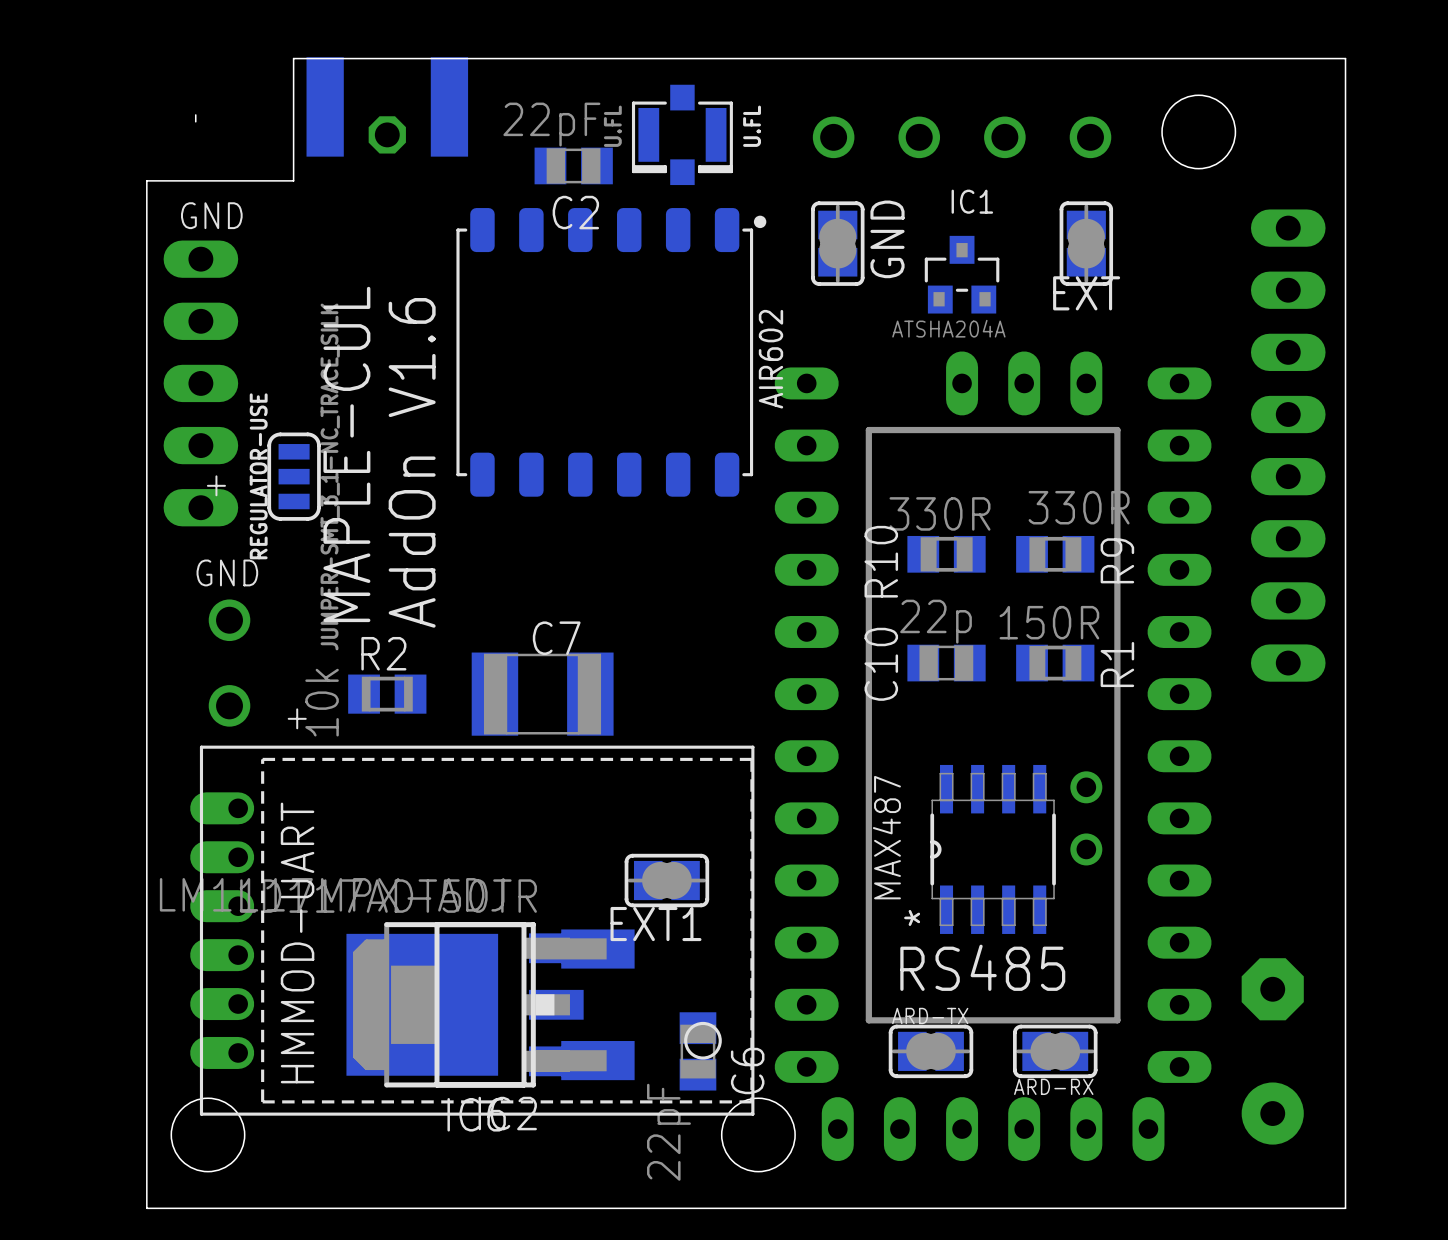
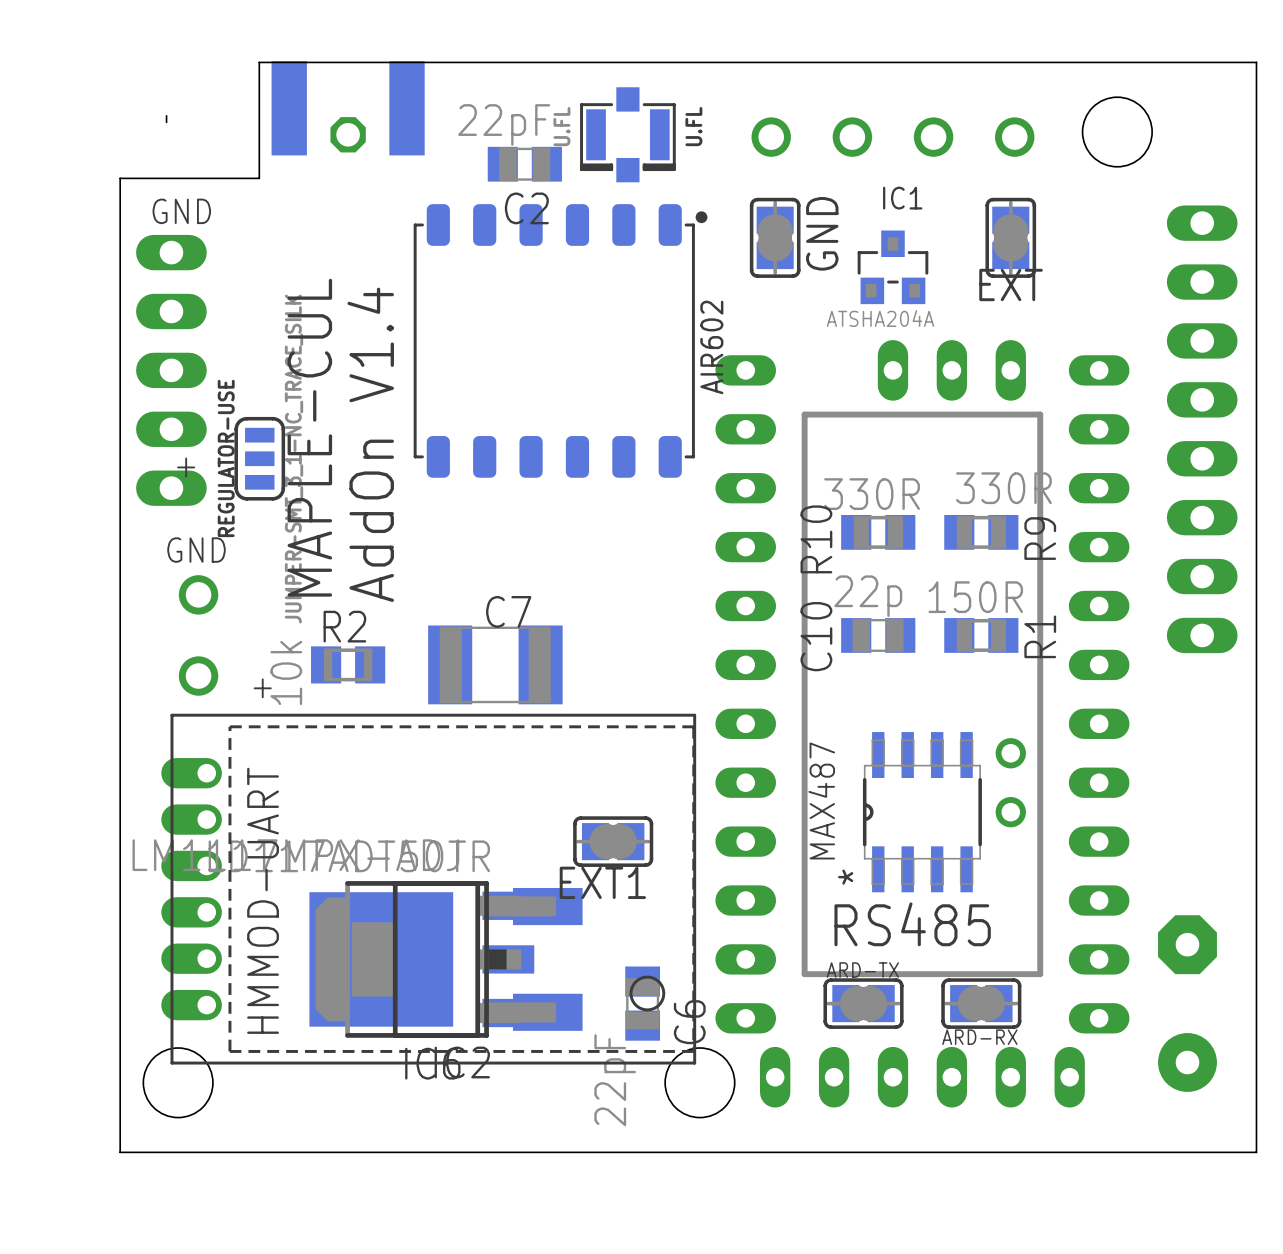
text: AddOn V1.6 (412, 462) -> AddOn V1.4 (370, 444)

